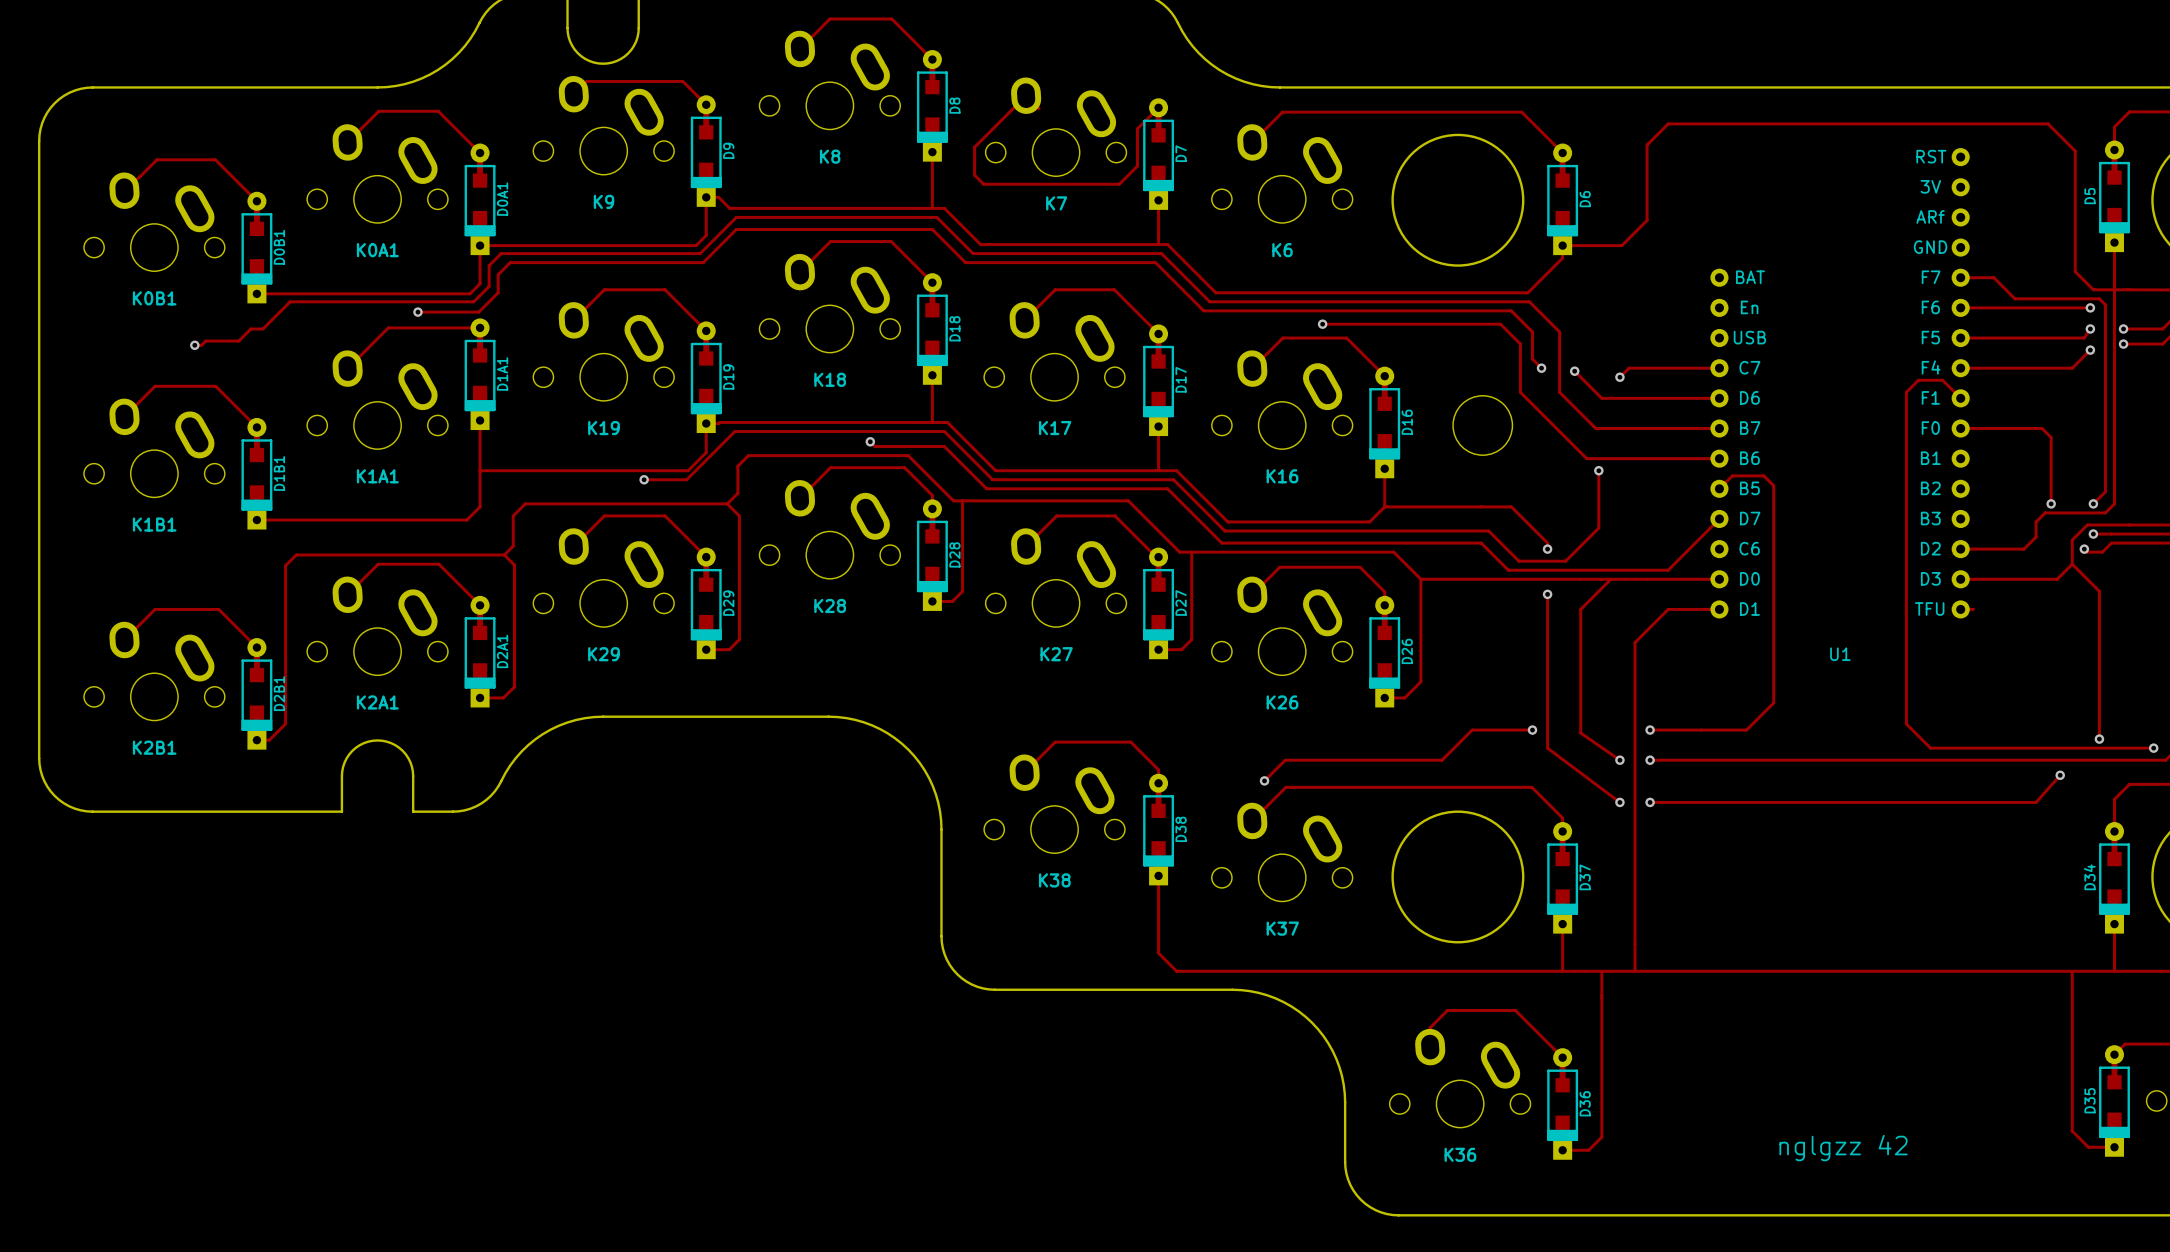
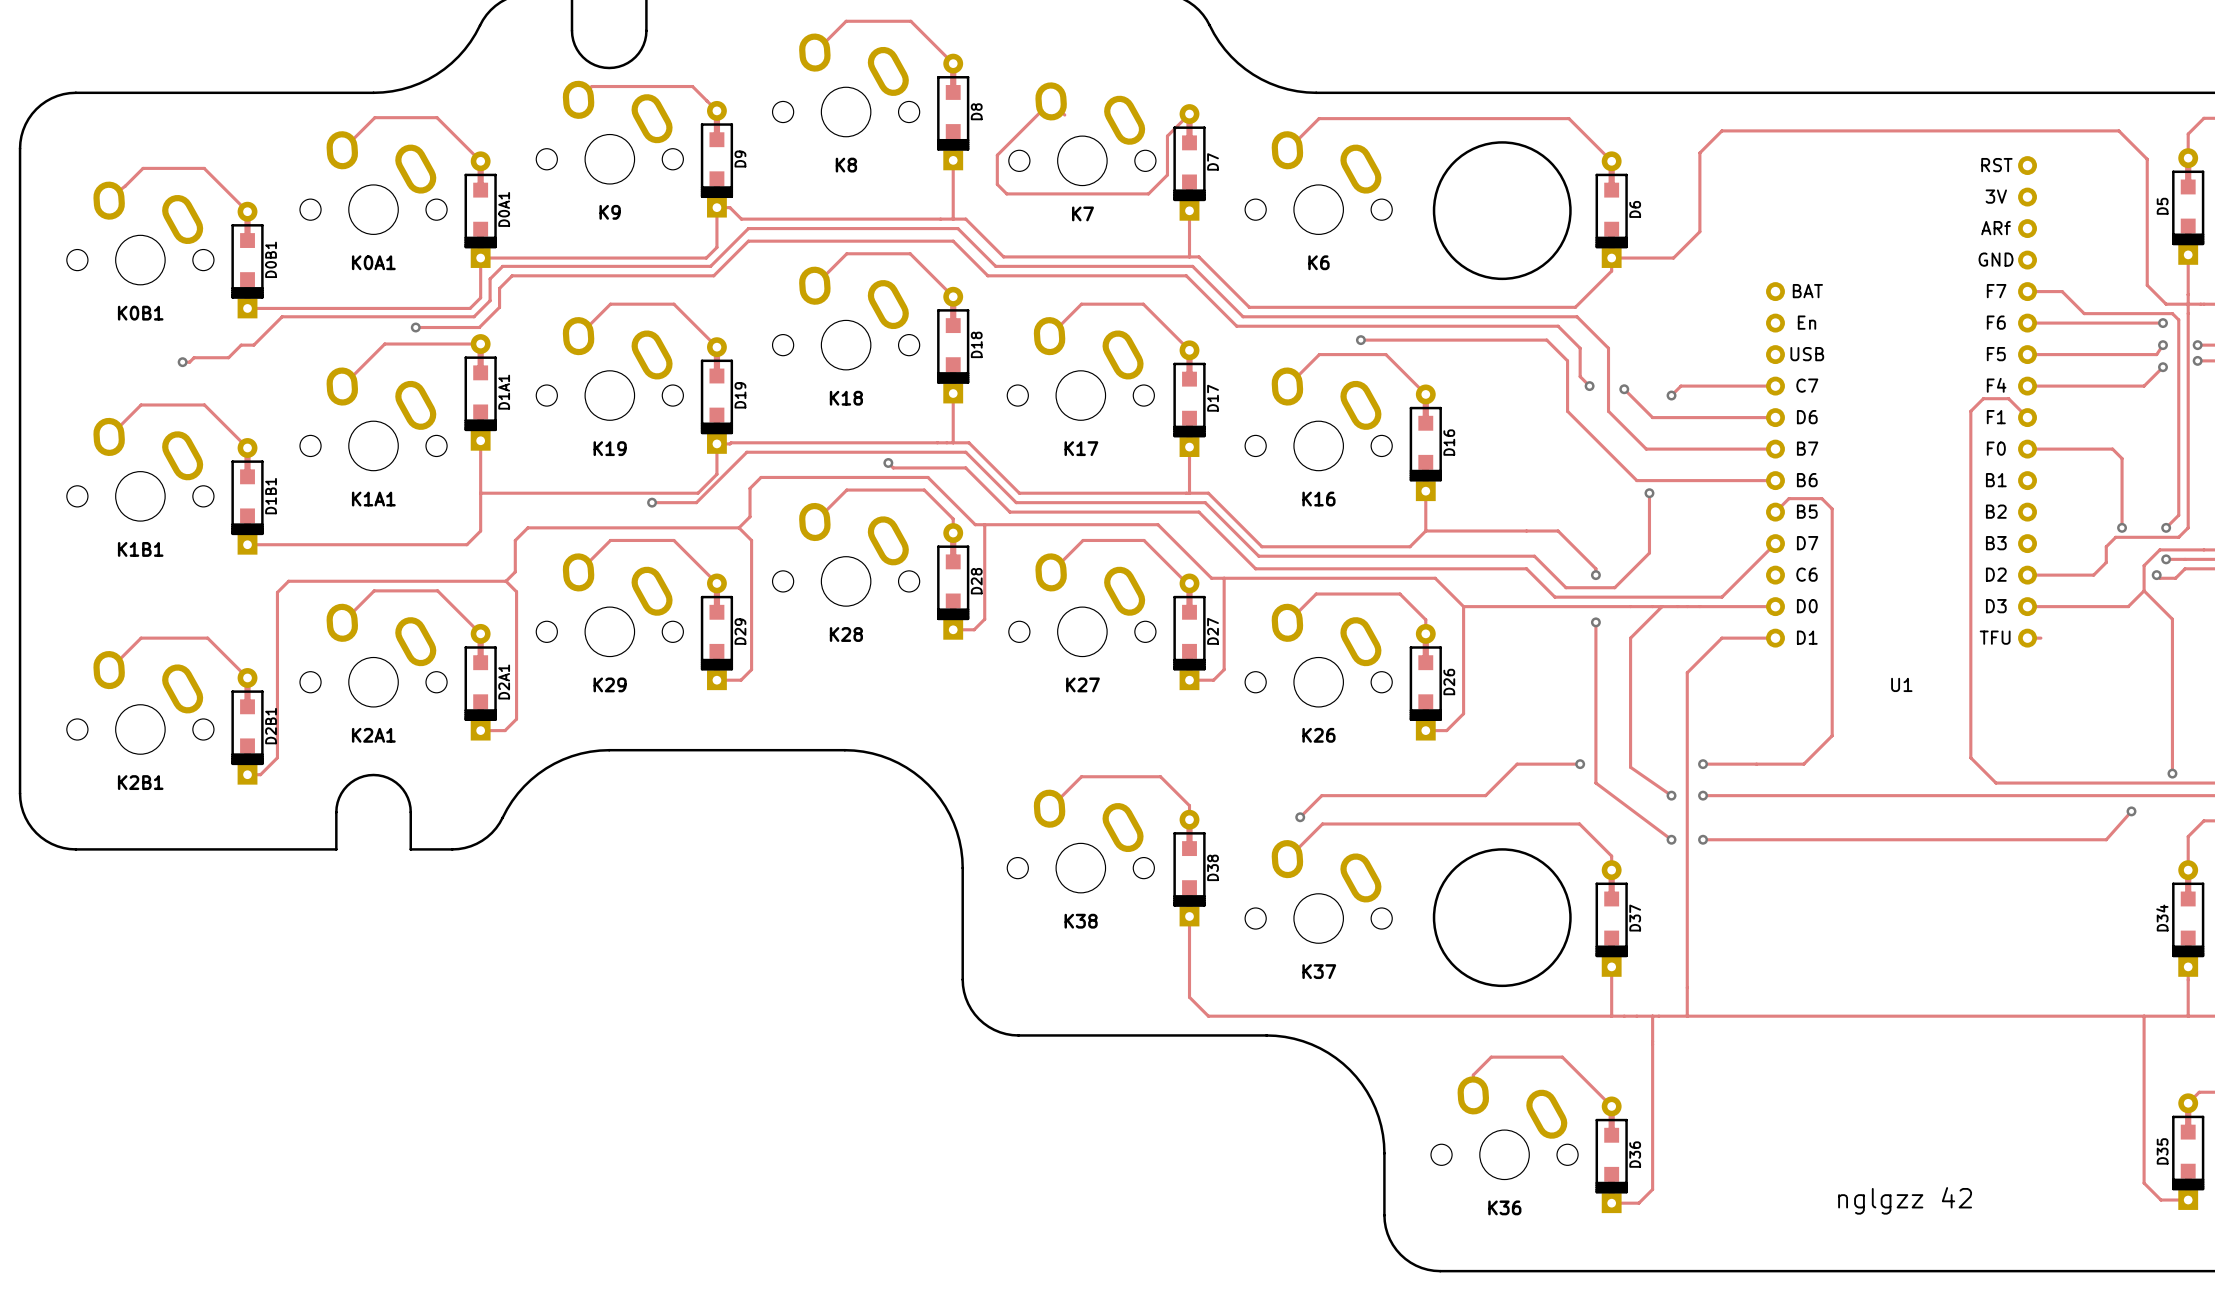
round board edge: [1452, 395, 1513, 456] -> none

